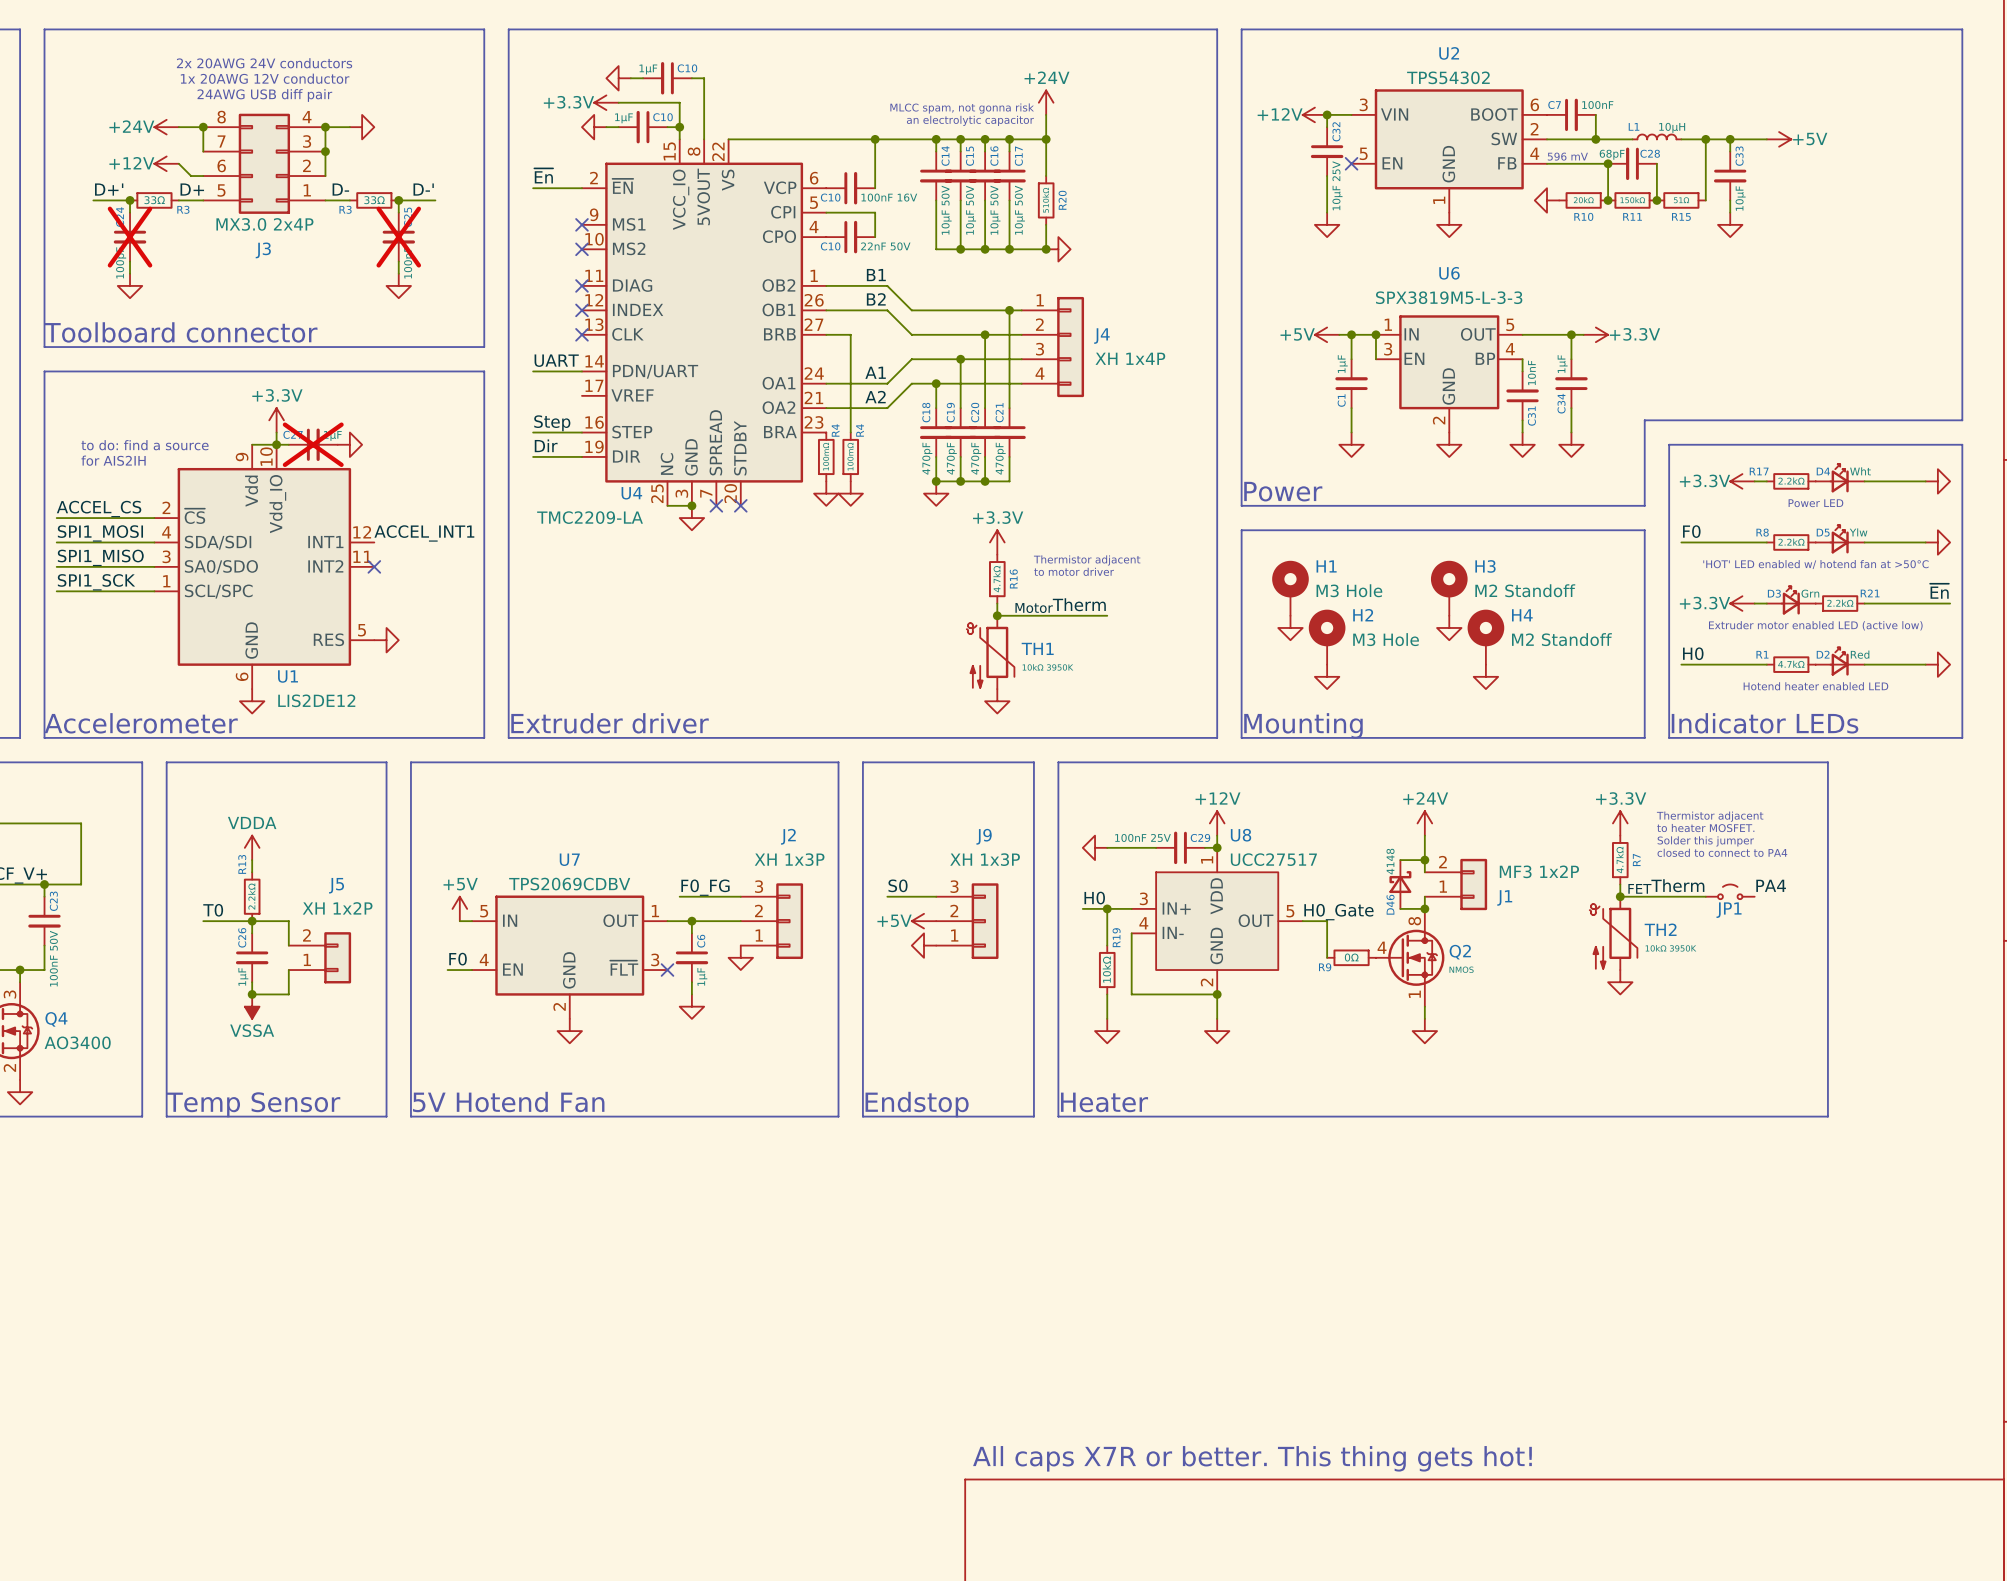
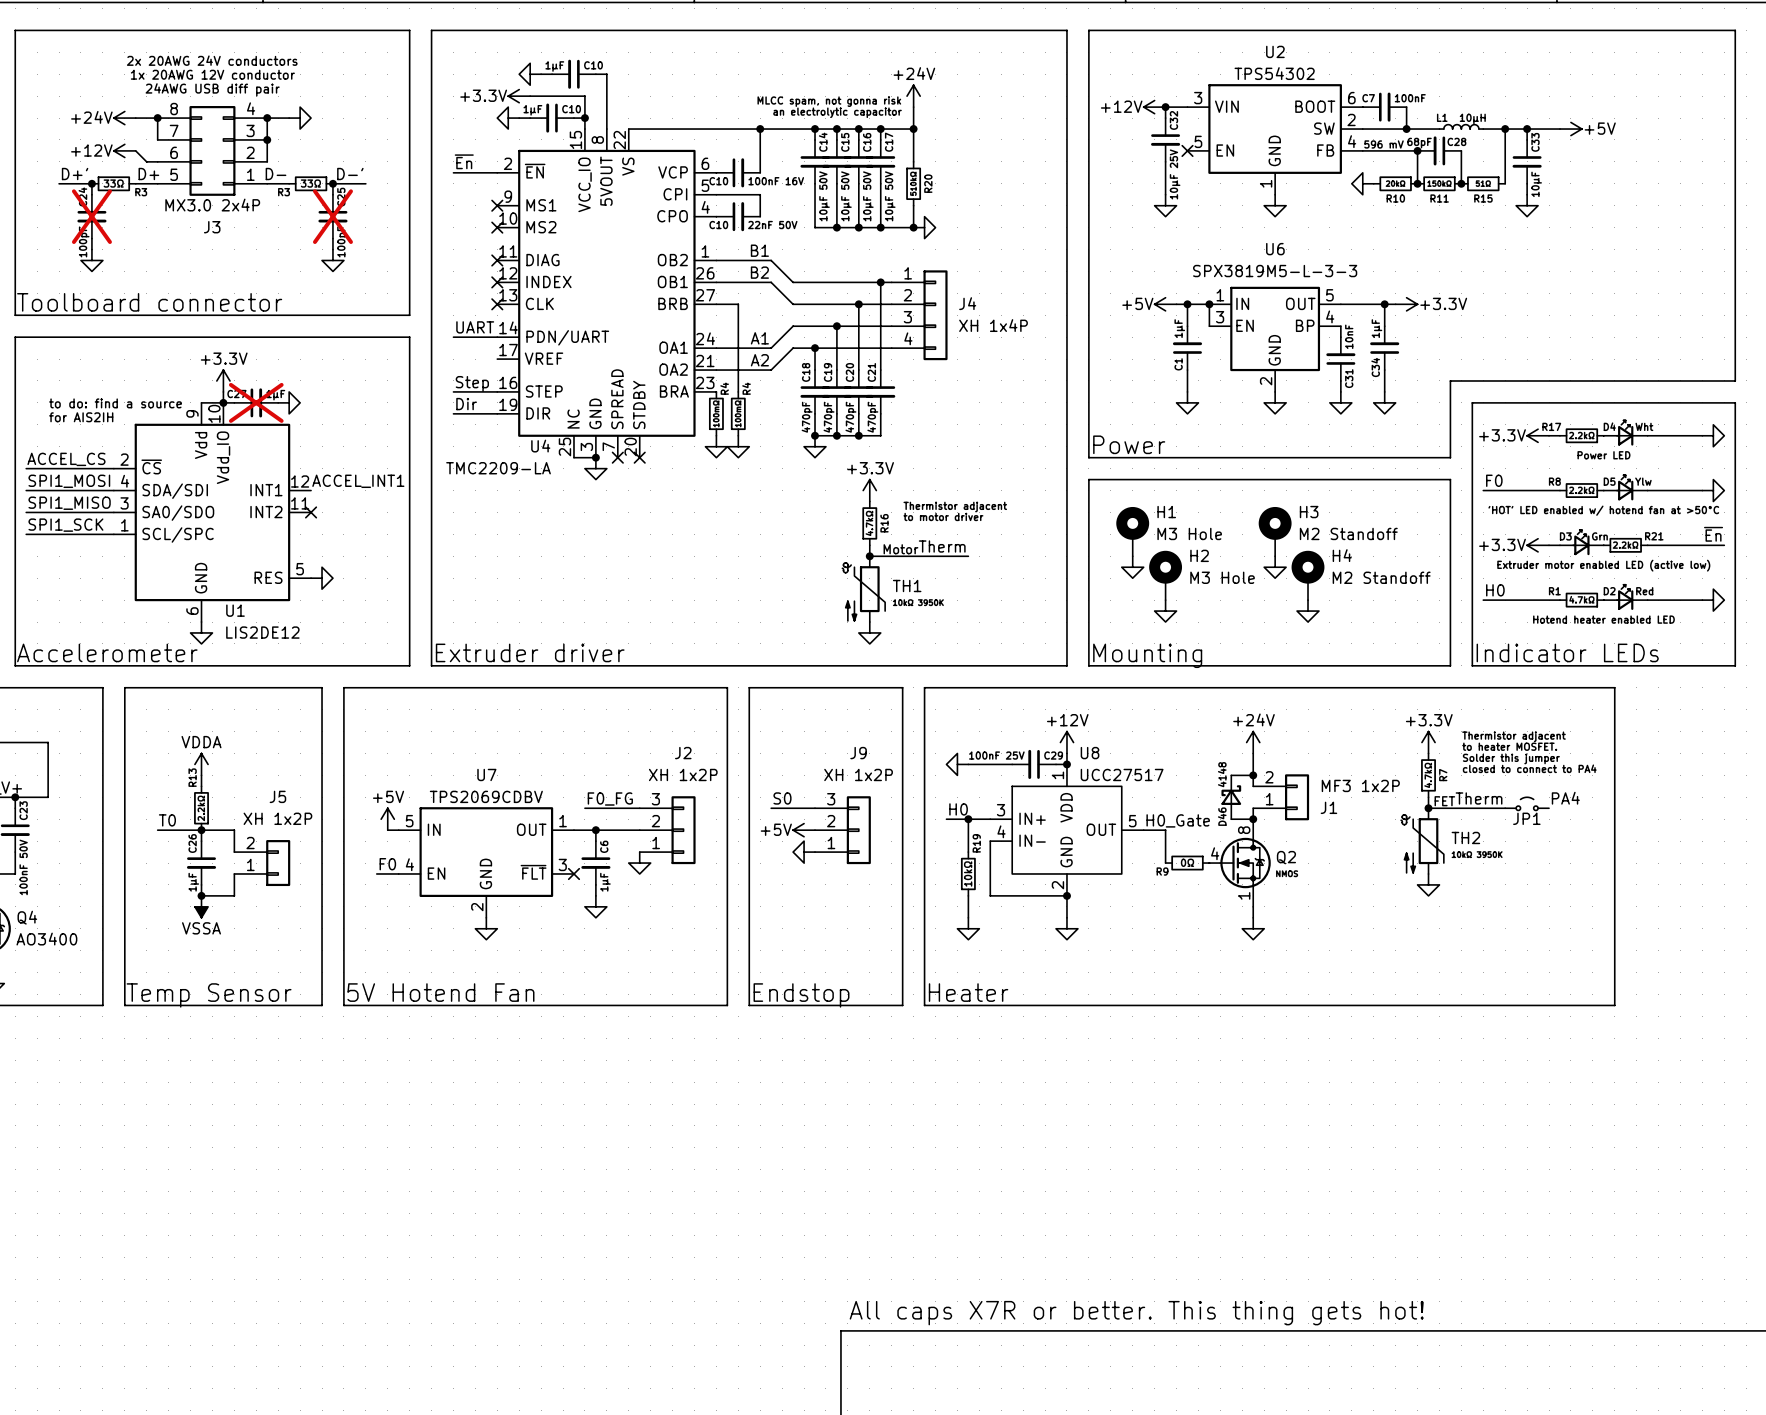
J2 value: XH 1x3P (789, 859) -> XH 1x2P (683, 774)
J9 value: XH 1x3P (985, 859) -> XH 1x2P (858, 774)

